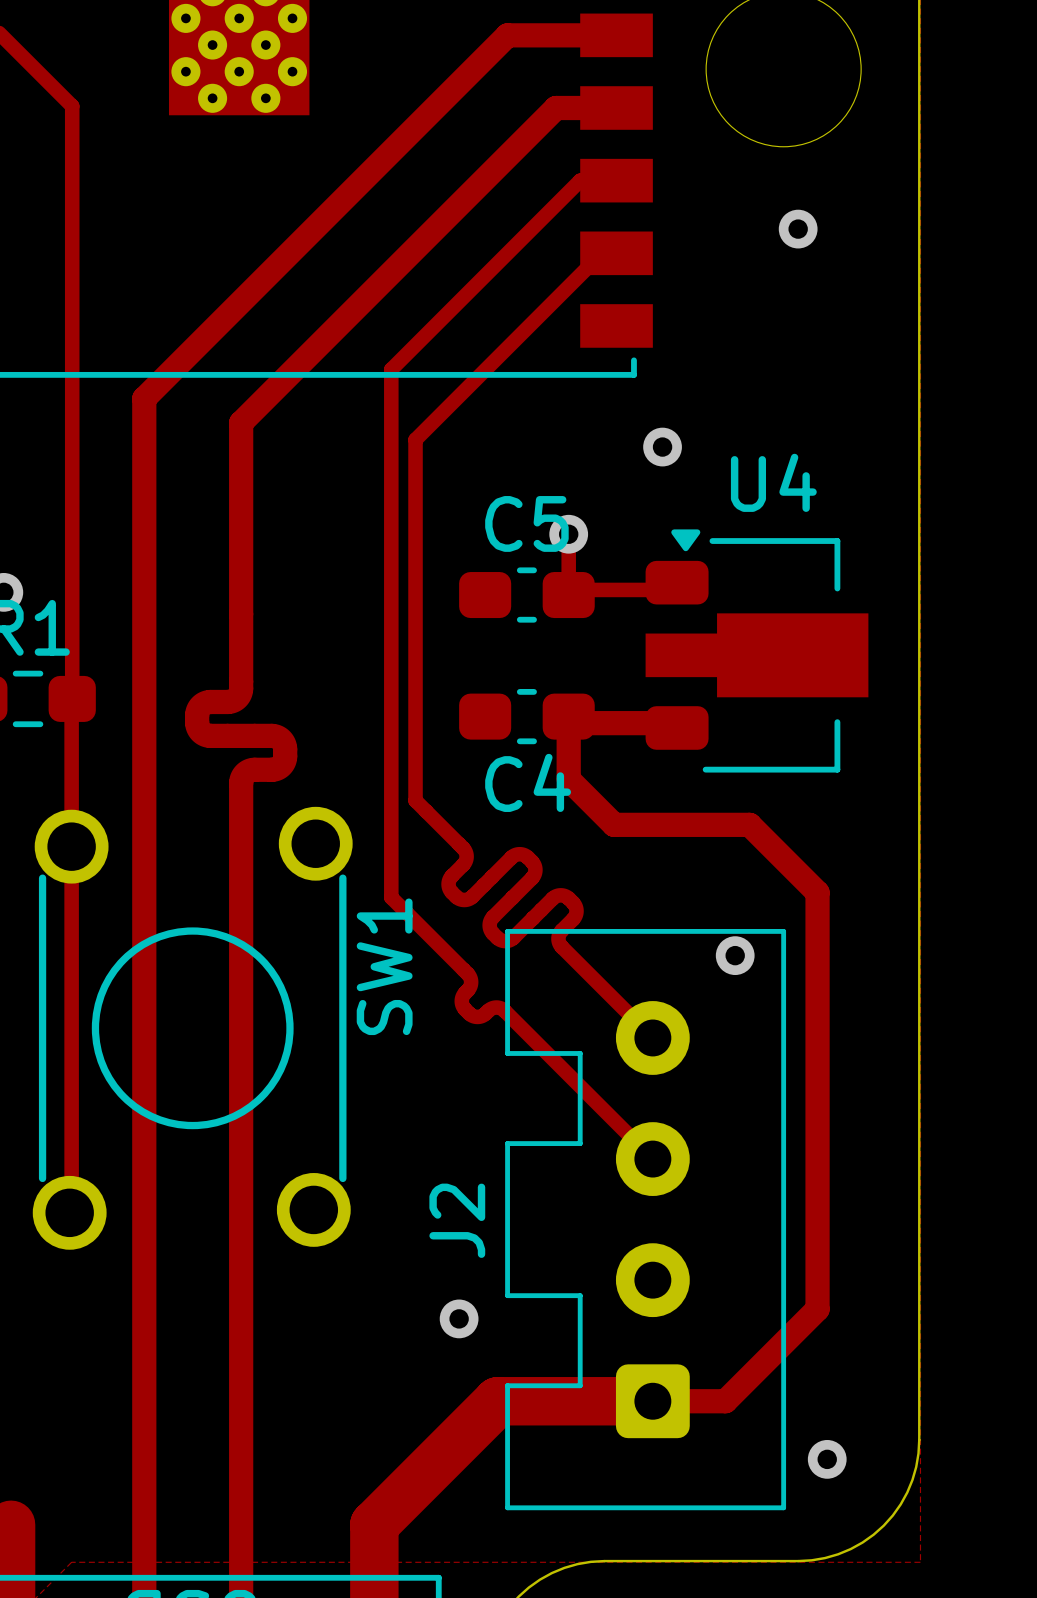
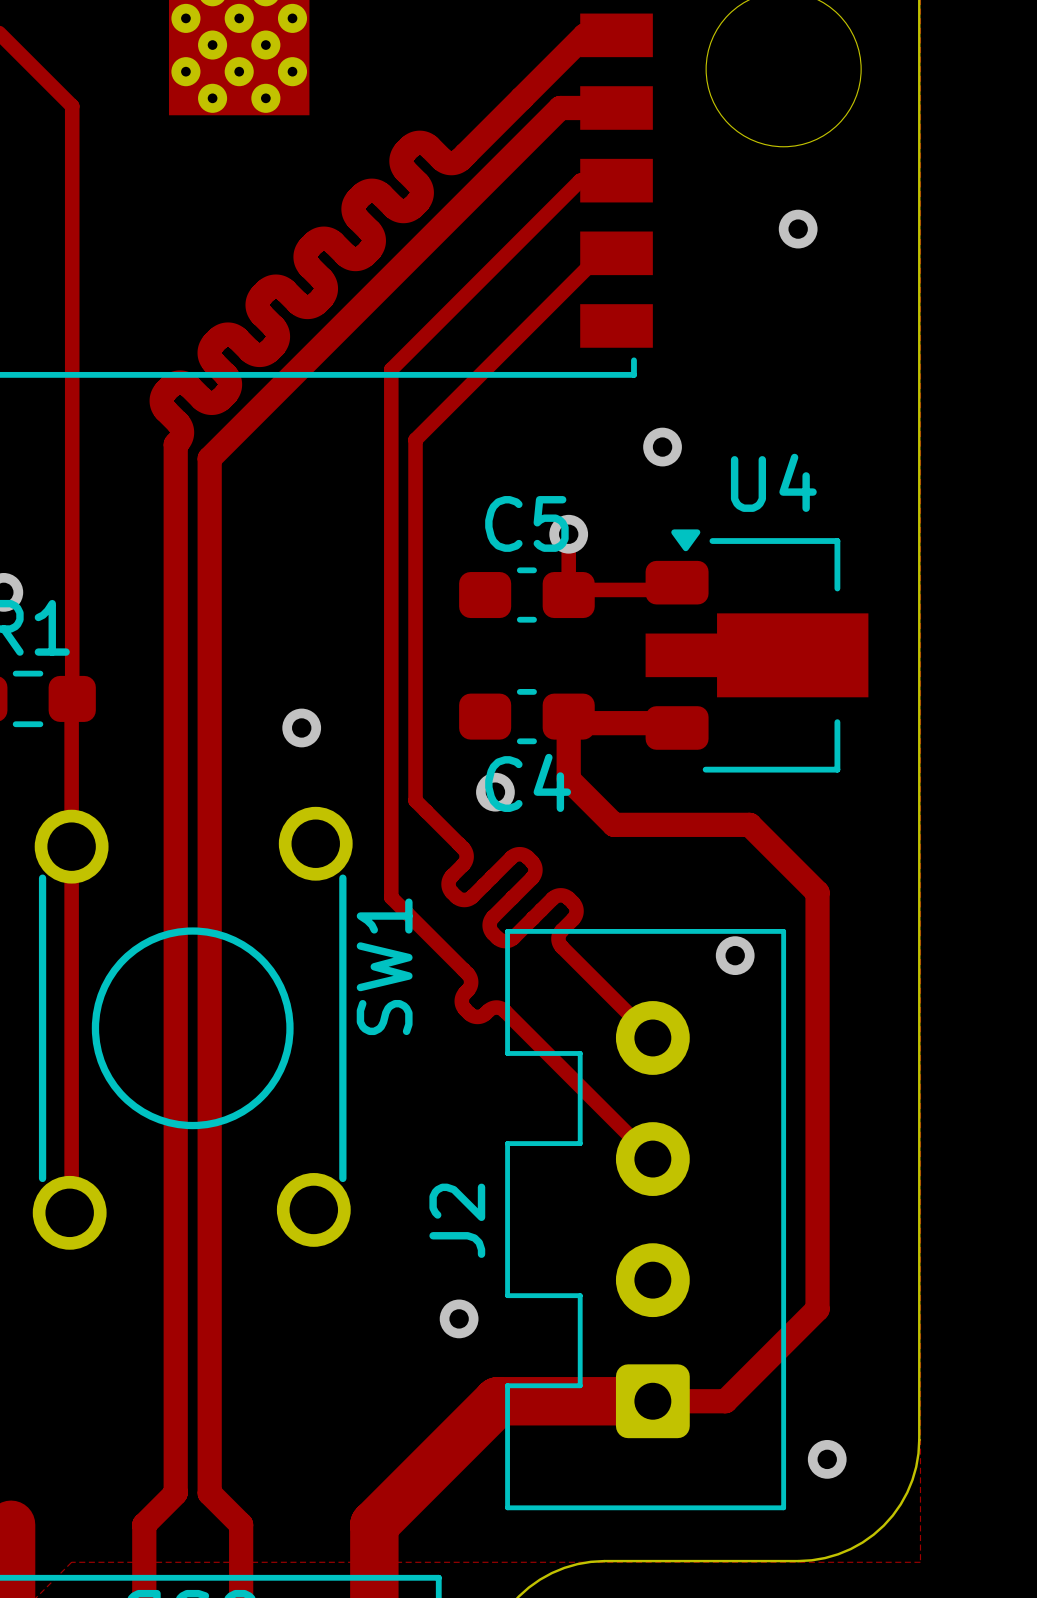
track: (584, 35) (507, 35) (144, 398) (144, 1524) -> (584, 35) (458, 161) (451, 163) (445, 161) (423, 143) (416, 143) (410, 146) (403, 154) (401, 162) (404, 169) (420, 186) (421, 194) (418, 201) (410, 209) (401, 211) (395, 208) (377, 191) (370, 190) (362, 194) (355, 202) (353, 210) (356, 217) (372, 234) (373, 242) (371, 247) (362, 256) (355, 259) (348, 256) (327, 239) (318, 239) (309, 247) (305, 255) (306, 262) (323, 281) (325, 293) (316, 304) (307, 307) (300, 304) (279, 287) (270, 287) (261, 295) (258, 301) (258, 310) (275, 328) (277, 335) (275, 343) (266, 352) (261, 354) (253, 353) (236, 337) (229, 334) (221, 336) (213, 343) (210, 349) (210, 358) (227, 376) (229, 383) (227, 391) (219, 400) (213, 402) (206, 401) (188, 385) (180, 382) (171, 385) (162, 397) (163, 407) (179, 424) (182, 432) (180, 438) (175, 444) (175, 1492)
track: (560, 108) (555, 108) (241, 422) (241, 689) (238, 696) (232, 701) (203, 704) (198, 709) (197, 715) (198, 728) (206, 735) (274, 736) (282, 741) (285, 749) (284, 760) (280, 766) (273, 769) (250, 770) (244, 774) (241, 781) (241, 1524) -> (560, 108) (209, 458) (209, 1493) (241, 1524)
via: none -> (301, 727)
via: none -> (495, 792)
track: none -> (175, 1493) (144, 1524)

